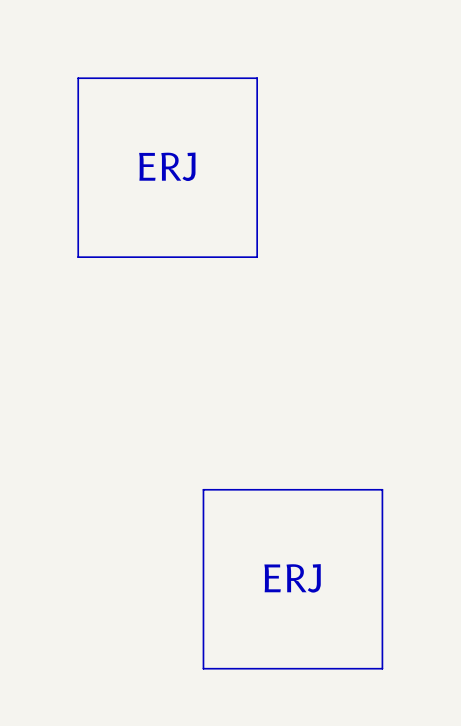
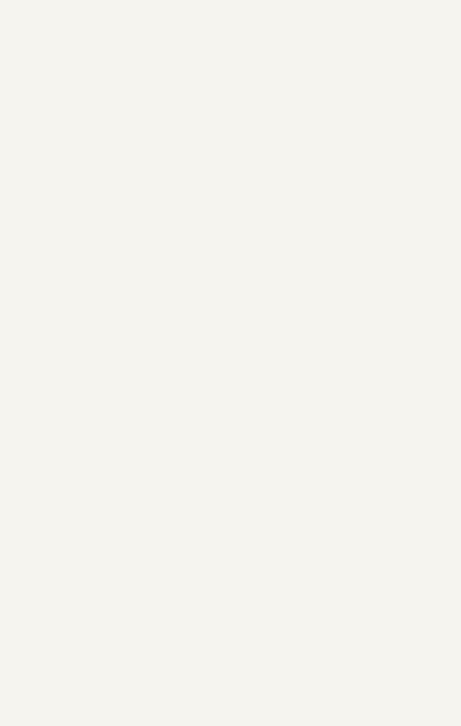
line: (78, 78) (257, 78) (257, 257) (78, 257) (78, 78) -> none
text: ERJ (167, 166) -> none
line: (203, 489) (382, 489) (382, 668) (203, 668) (203, 489) -> none
text: ERJ (292, 578) -> none

